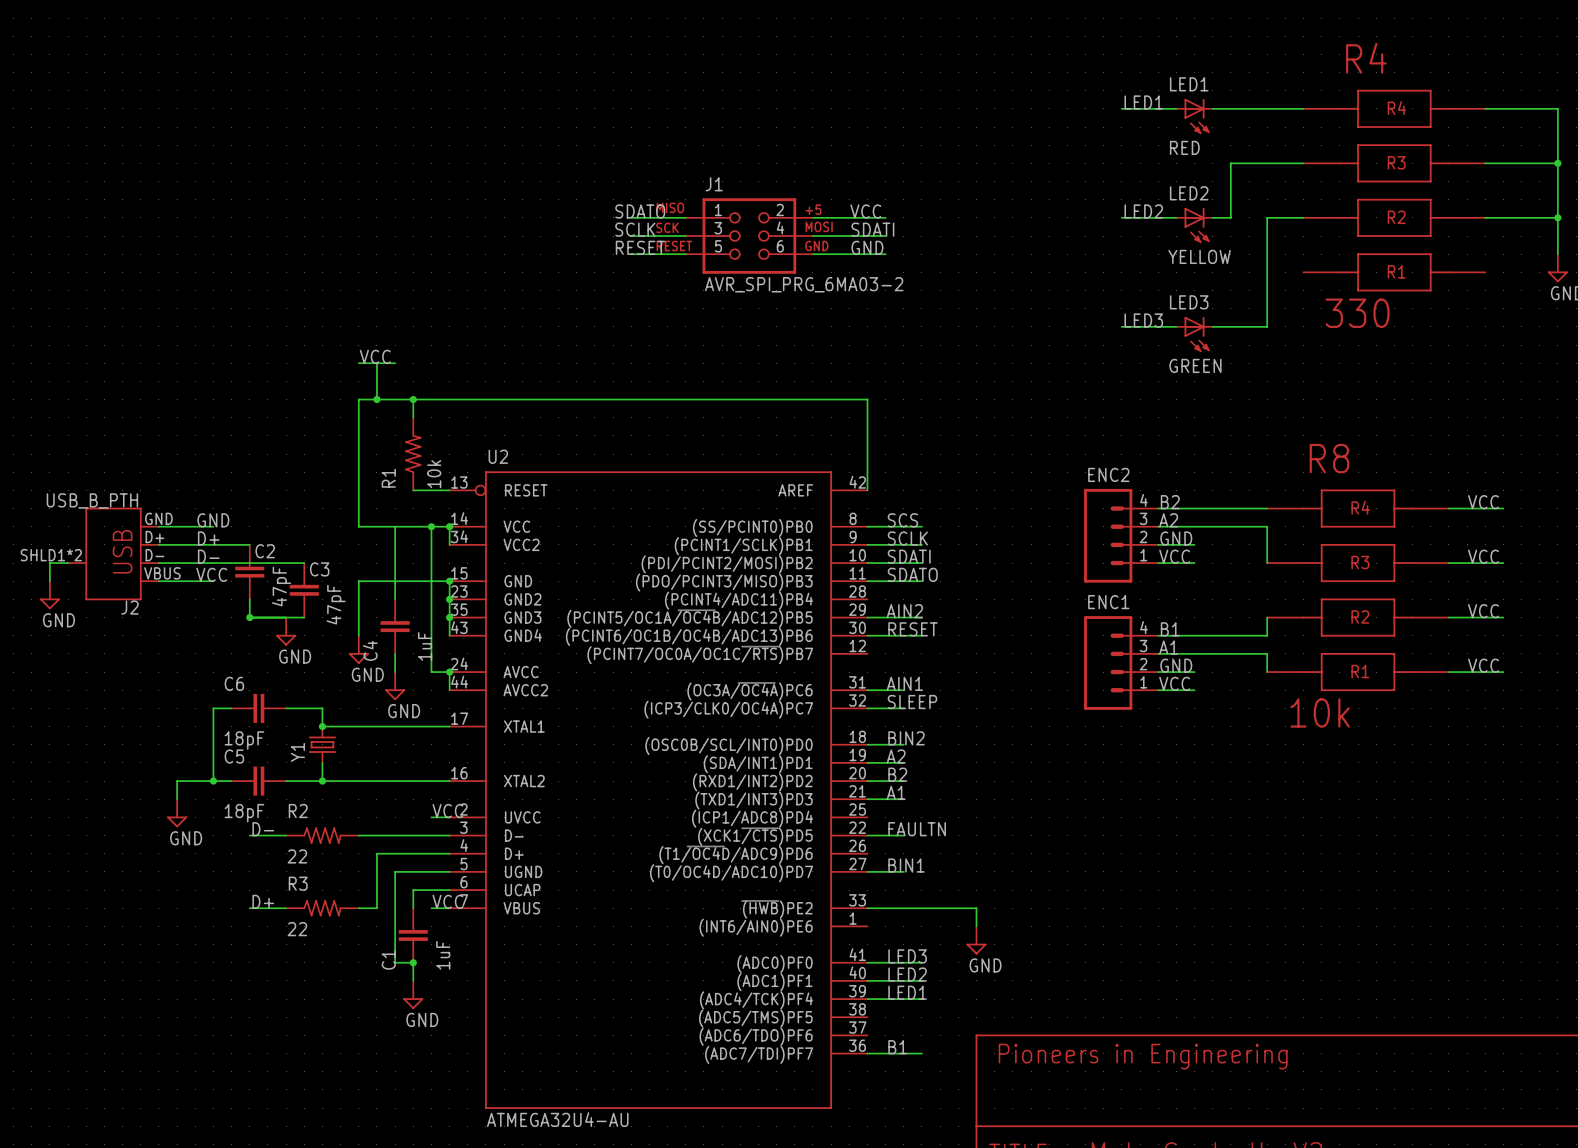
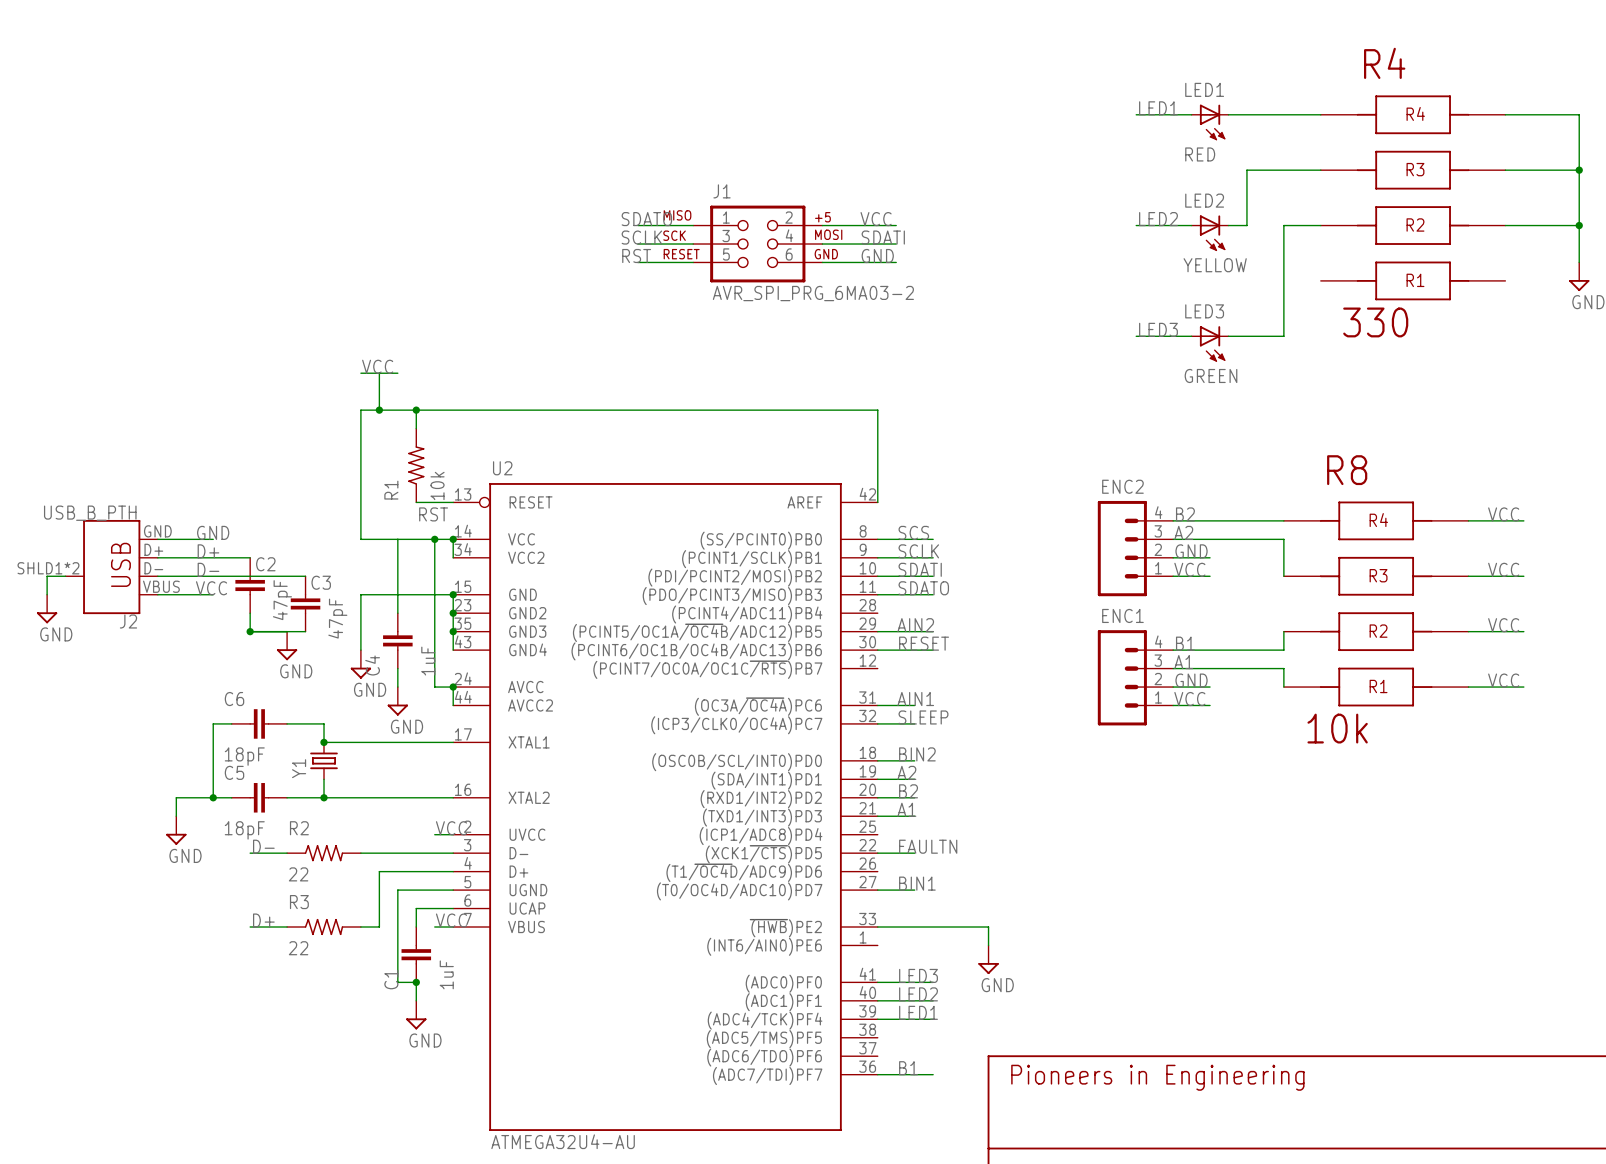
label: RESET (640, 247) -> RST (636, 256)
label: none -> RST (433, 514)

